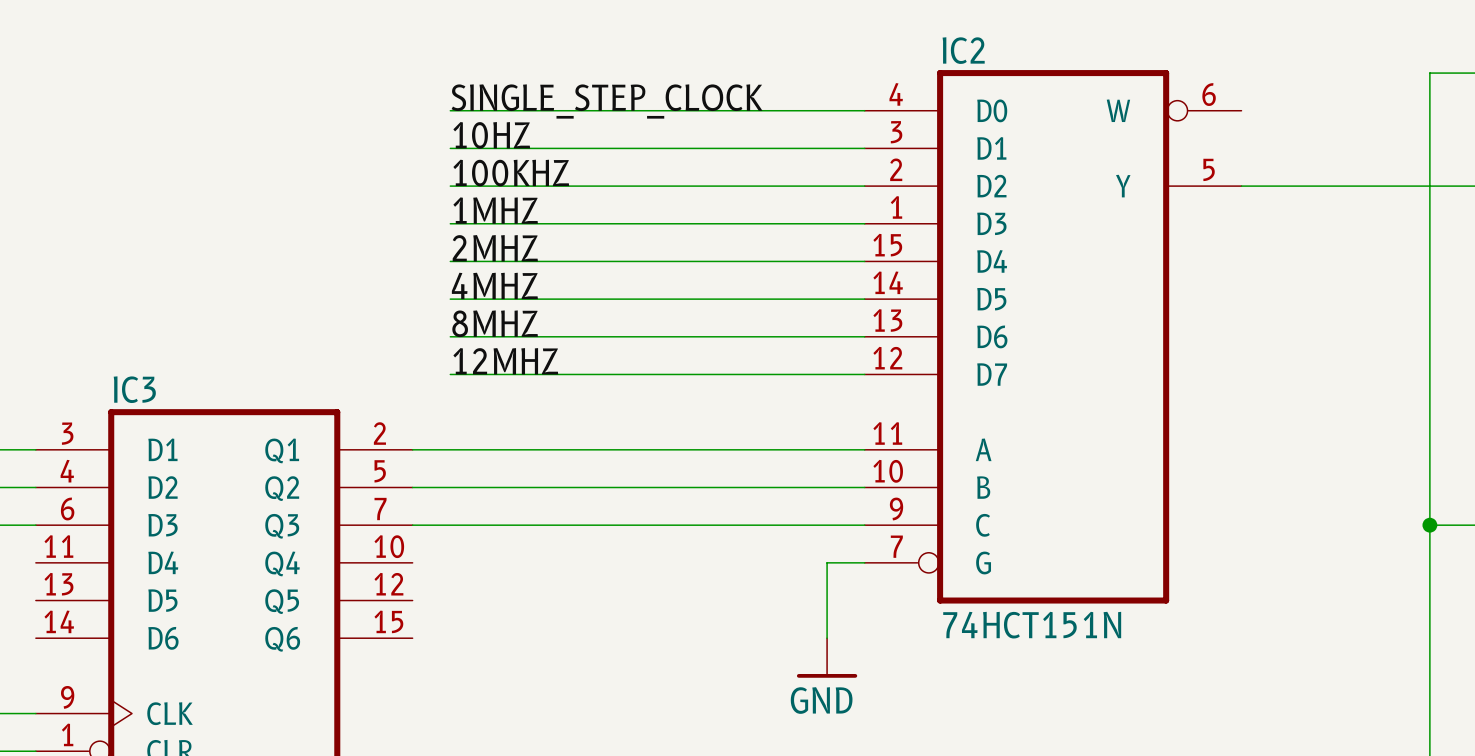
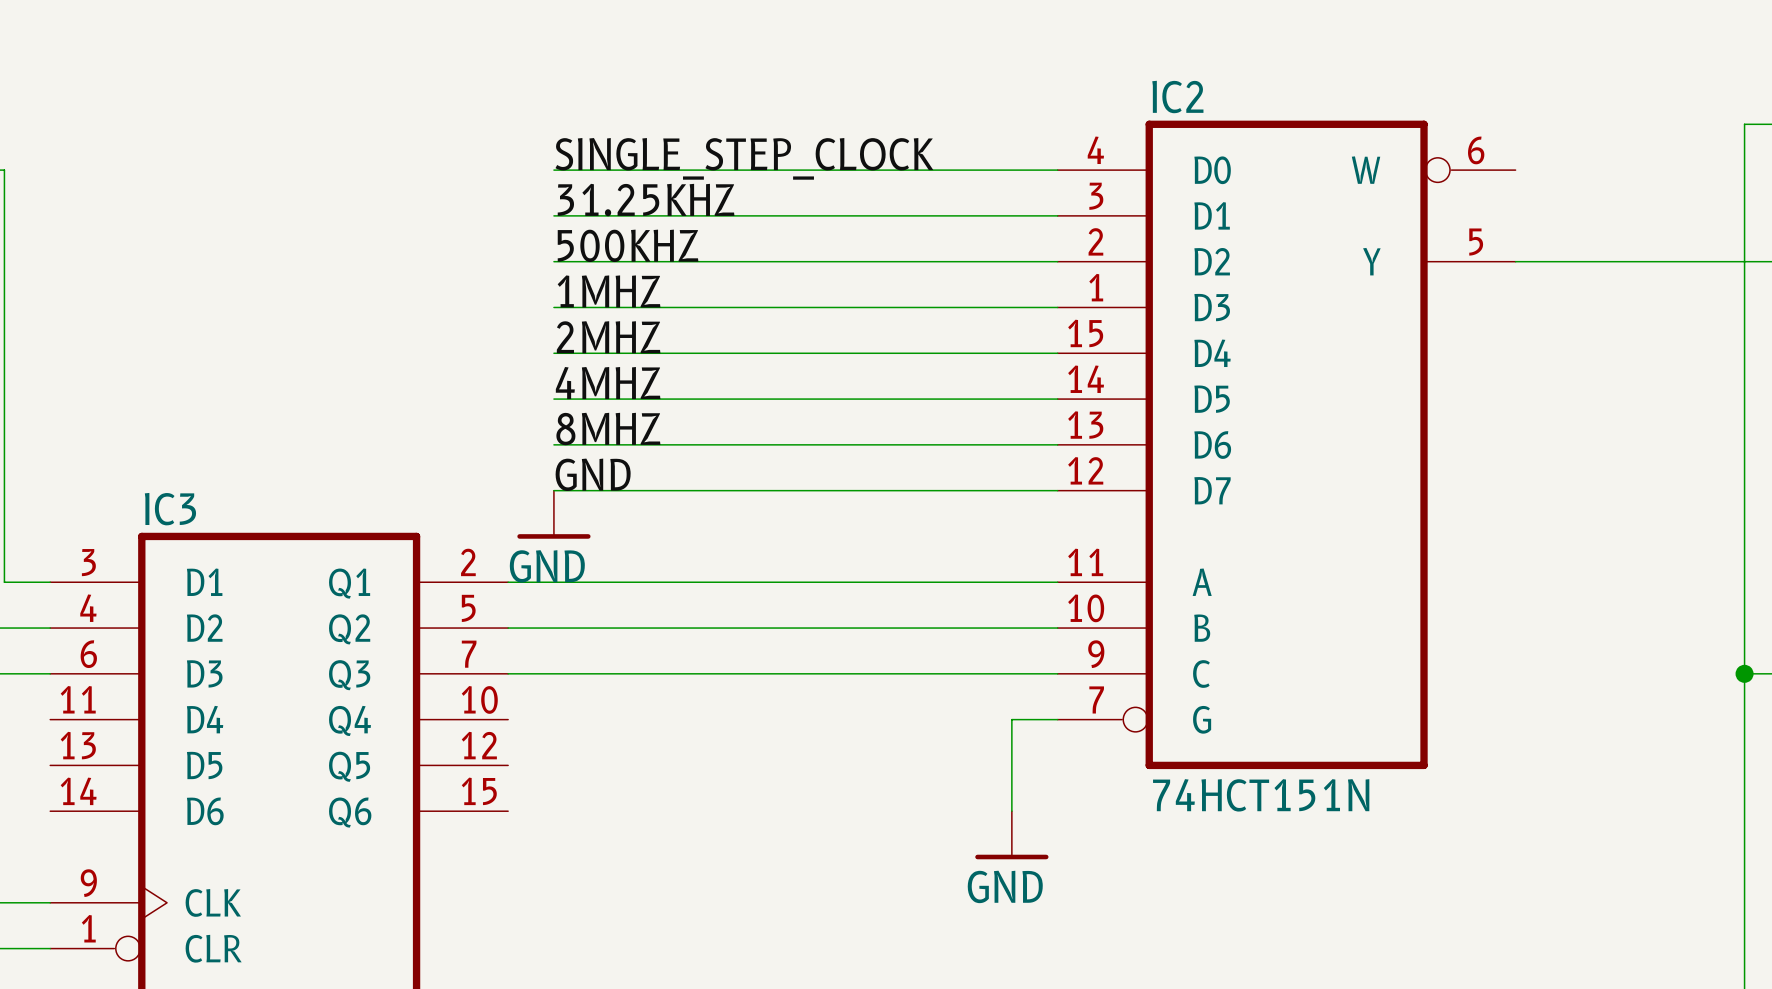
label: 10HZ (491, 135) -> 31.25KHZ (646, 200)
label: 100KHZ (511, 173) -> 500KHZ (628, 245)
label: 12MHZ (505, 361) -> GND (593, 474)
power symbol: none -> GND (553, 514)

